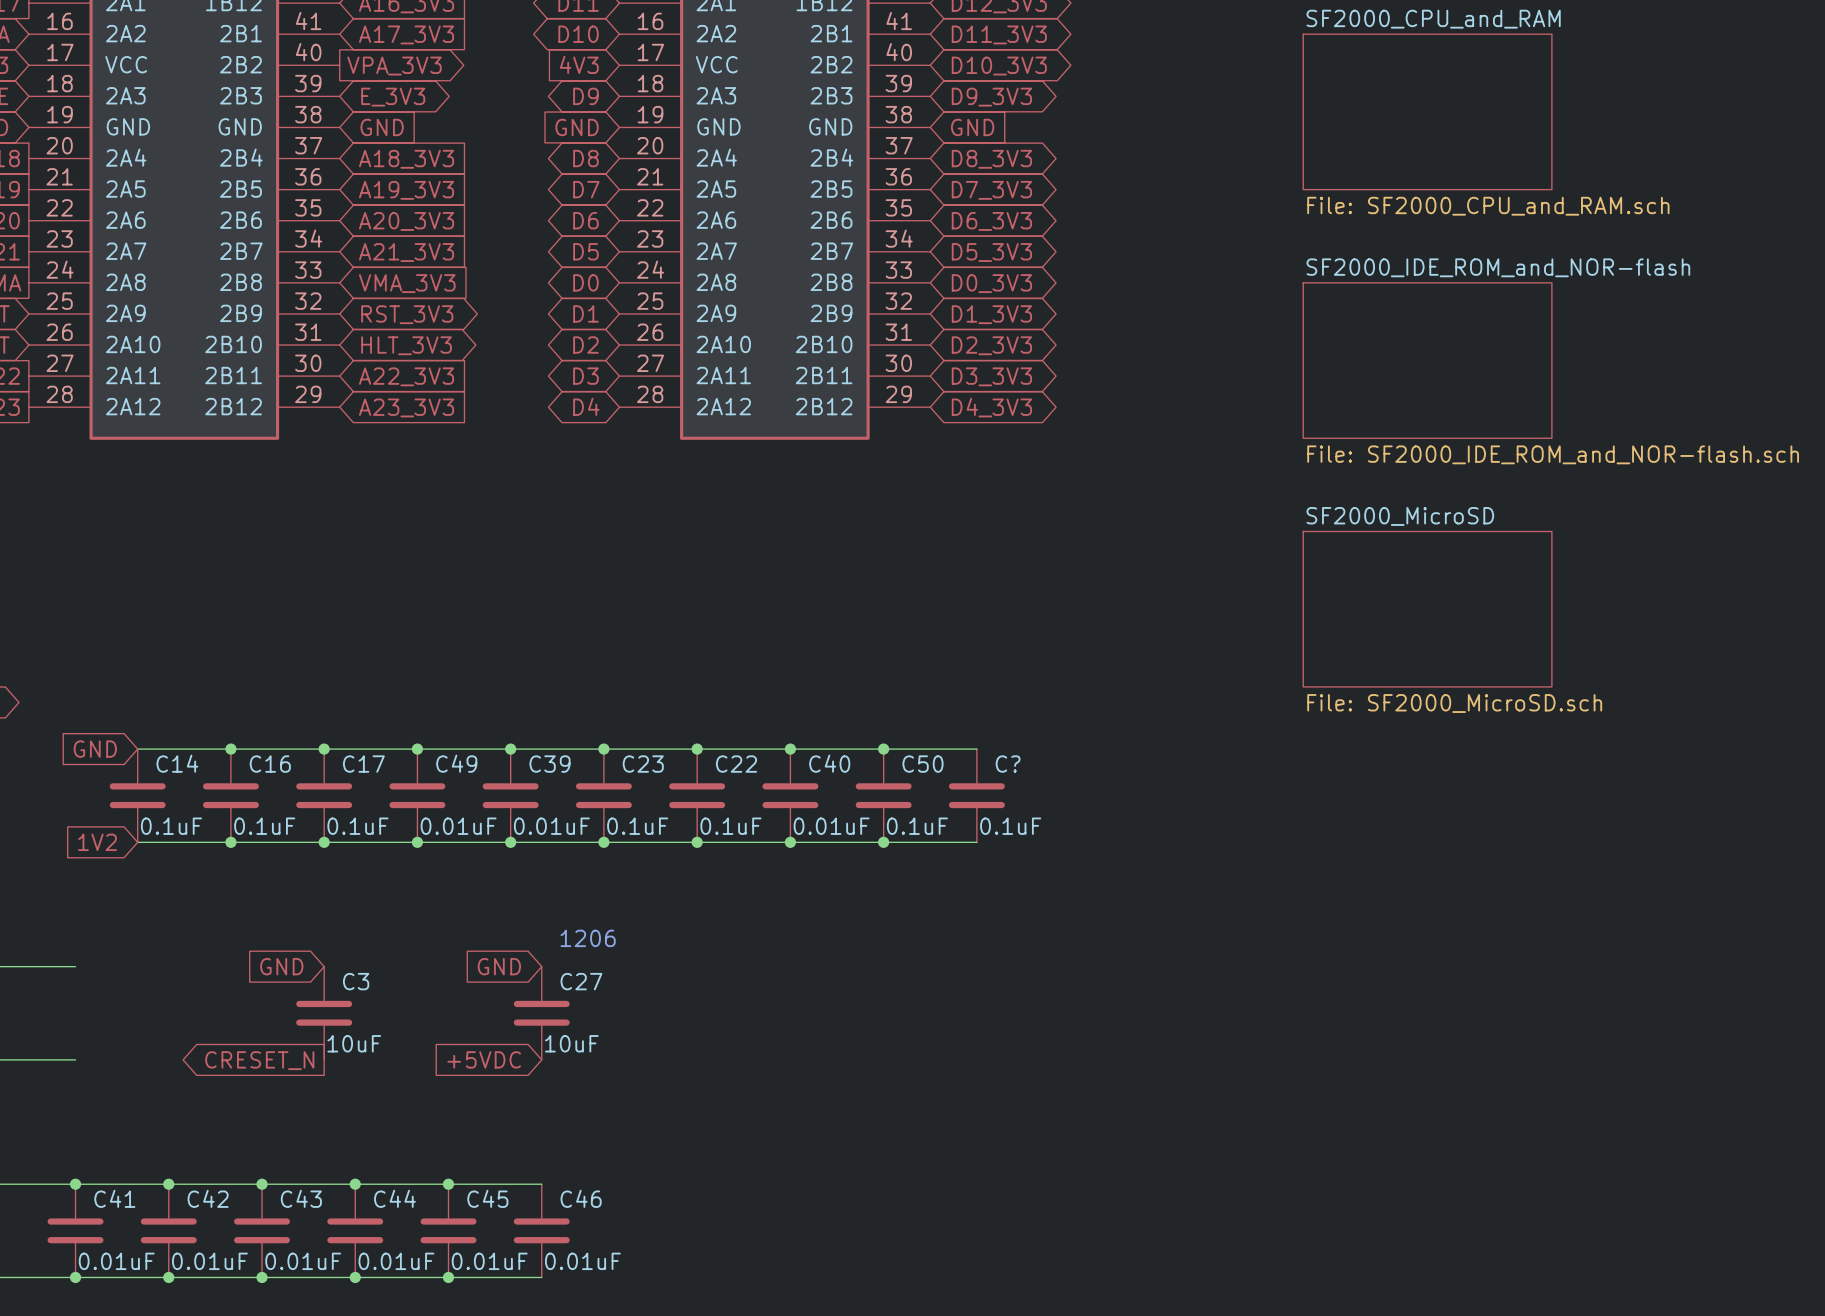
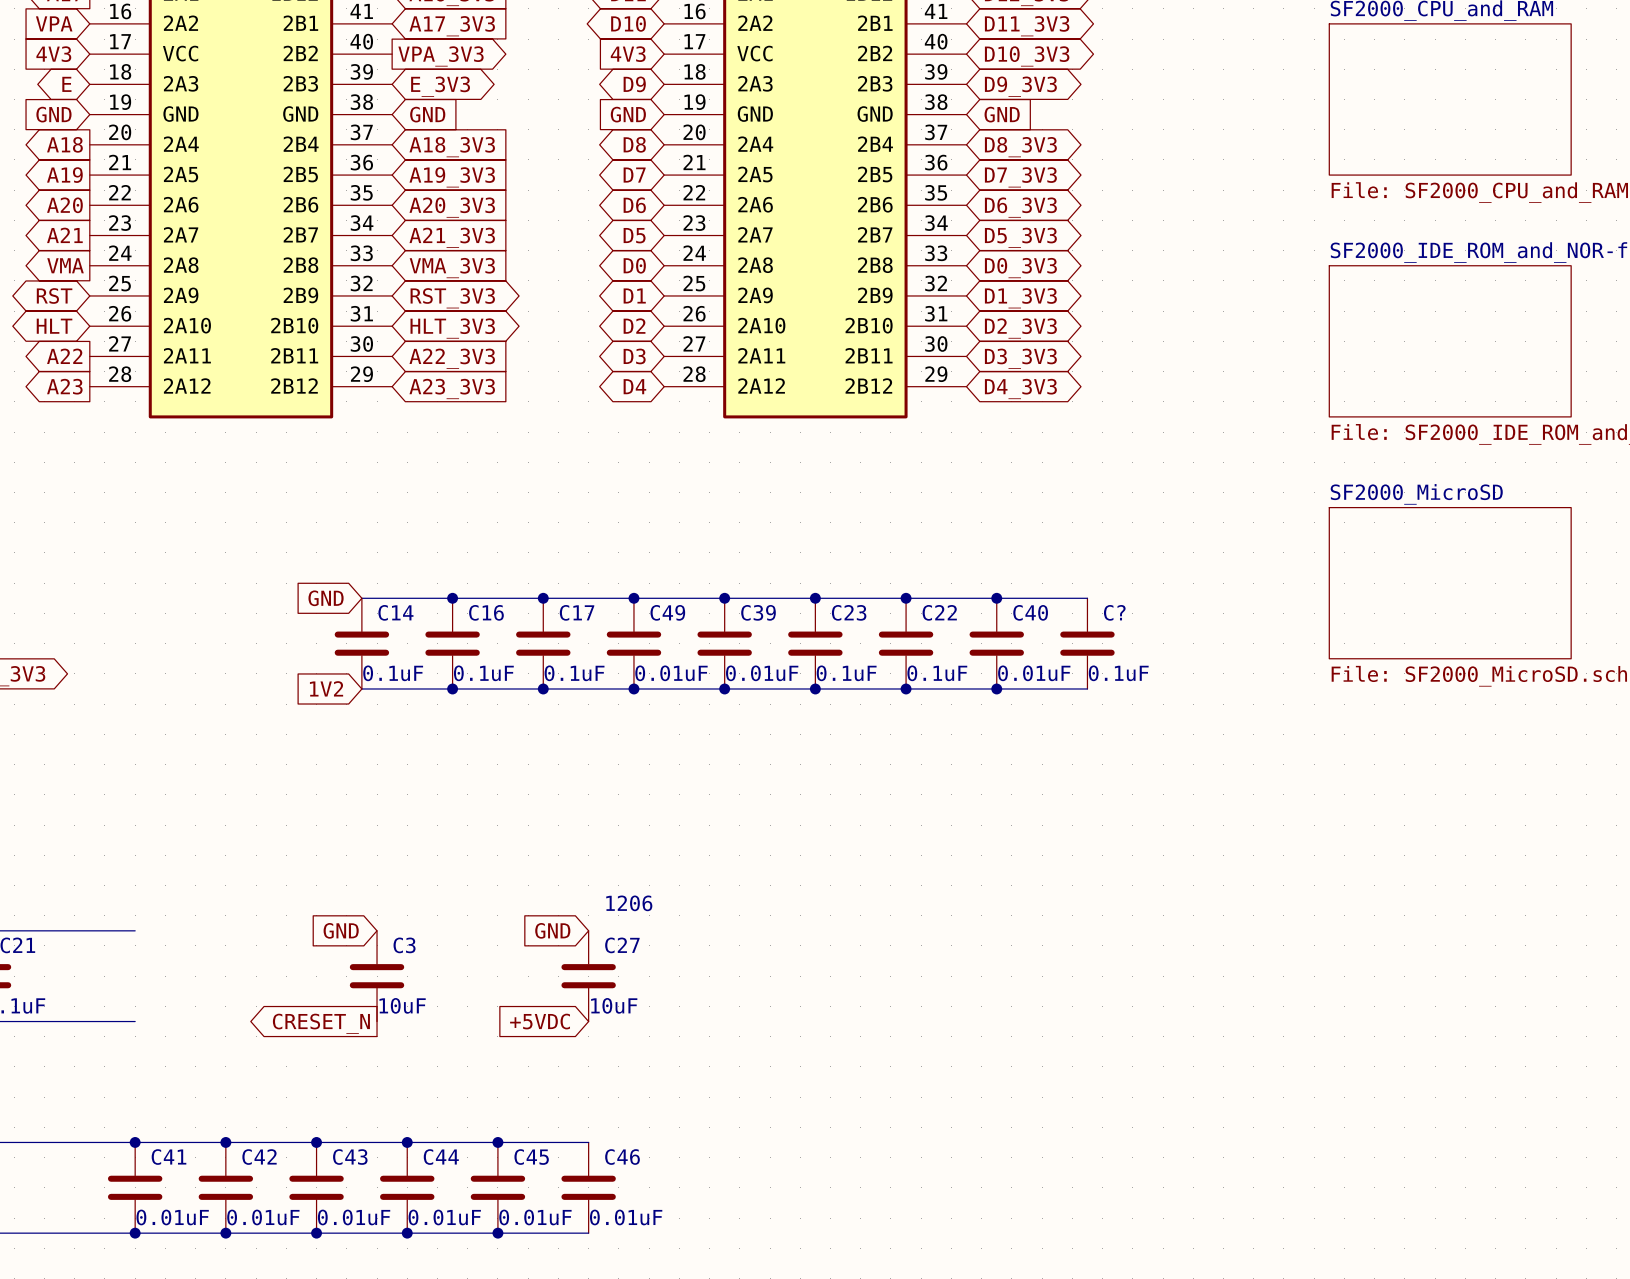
wire: none -> (361, 598) (1087, 598)
junction: none -> (452, 598)
junction: none -> (543, 598)
junction: none -> (633, 598)
junction: none -> (724, 598)
junction: none -> (815, 598)
junction: none -> (906, 598)
junction: none -> (996, 598)
wire: none -> (361, 688) (1087, 688)
junction: none -> (996, 688)
global label position: GND (95, 749) -> GND (326, 598)
wire: (137, 749) (976, 749) -> none
junction: (230, 749) -> none
junction: (324, 749) -> none
junction position: (417, 749) -> (452, 688)
junction position: (510, 749) -> (543, 688)
junction position: (603, 749) -> (633, 688)
junction position: (697, 749) -> (724, 688)
junction position: (790, 749) -> (815, 688)
junction position: (883, 749) -> (906, 688)
C14 position: (137, 795) -> (361, 643)
C16 position: (230, 795) -> (452, 643)
C17 position: (324, 795) -> (543, 643)
C49 position: (417, 795) -> (633, 643)
C39 position: (510, 795) -> (724, 643)
C23 position: (603, 795) -> (815, 643)
C22 position: (697, 795) -> (906, 643)
C40 position: (790, 795) -> (996, 643)
C50: 0.1uF (883, 795) -> none
C? position: (976, 795) -> (1087, 643)
global label position: 1V2 (97, 842) -> 1V2 (326, 688)
wire: (137, 842) (976, 842) -> none
junction: (230, 842) -> none
junction: (324, 842) -> none
junction: (417, 842) -> none
junction: (510, 842) -> none
junction: (603, 842) -> none
junction: (697, 842) -> none
junction: (790, 842) -> none
junction: (883, 842) -> none

